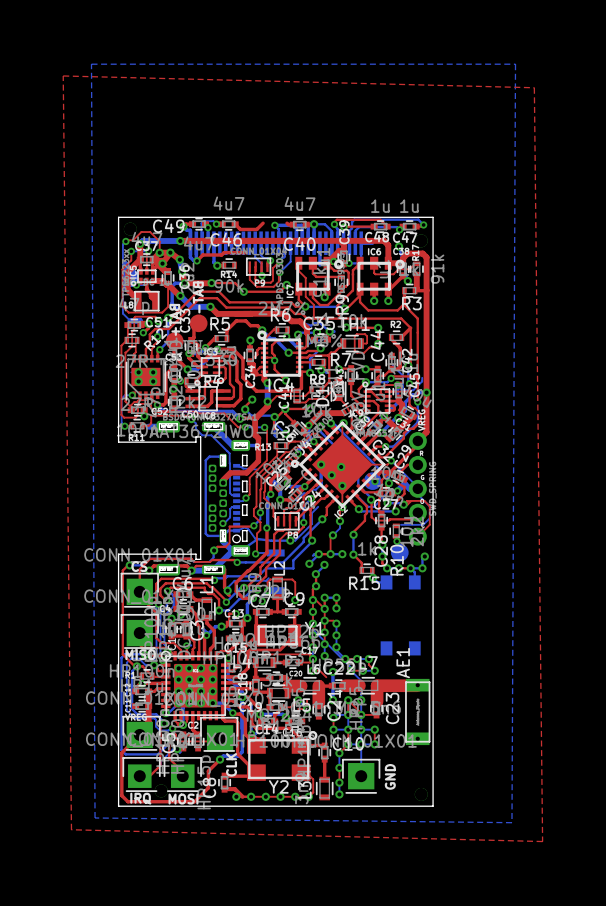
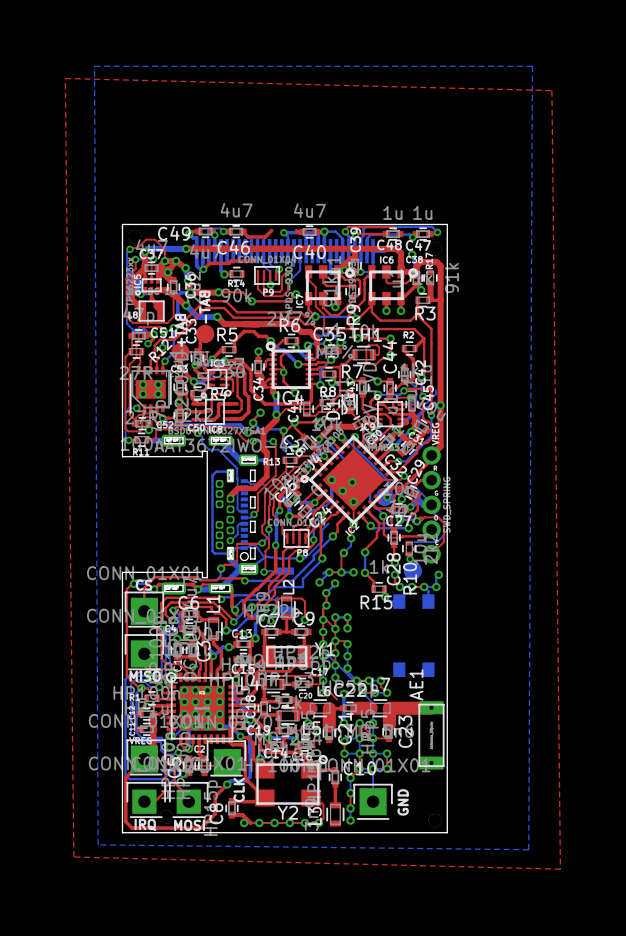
top track: (172, 368) (165, 374) (165, 402) (163, 404) -> (180, 380) (186, 387) (187, 413) (169, 418)
via: (180, 381) -> none

